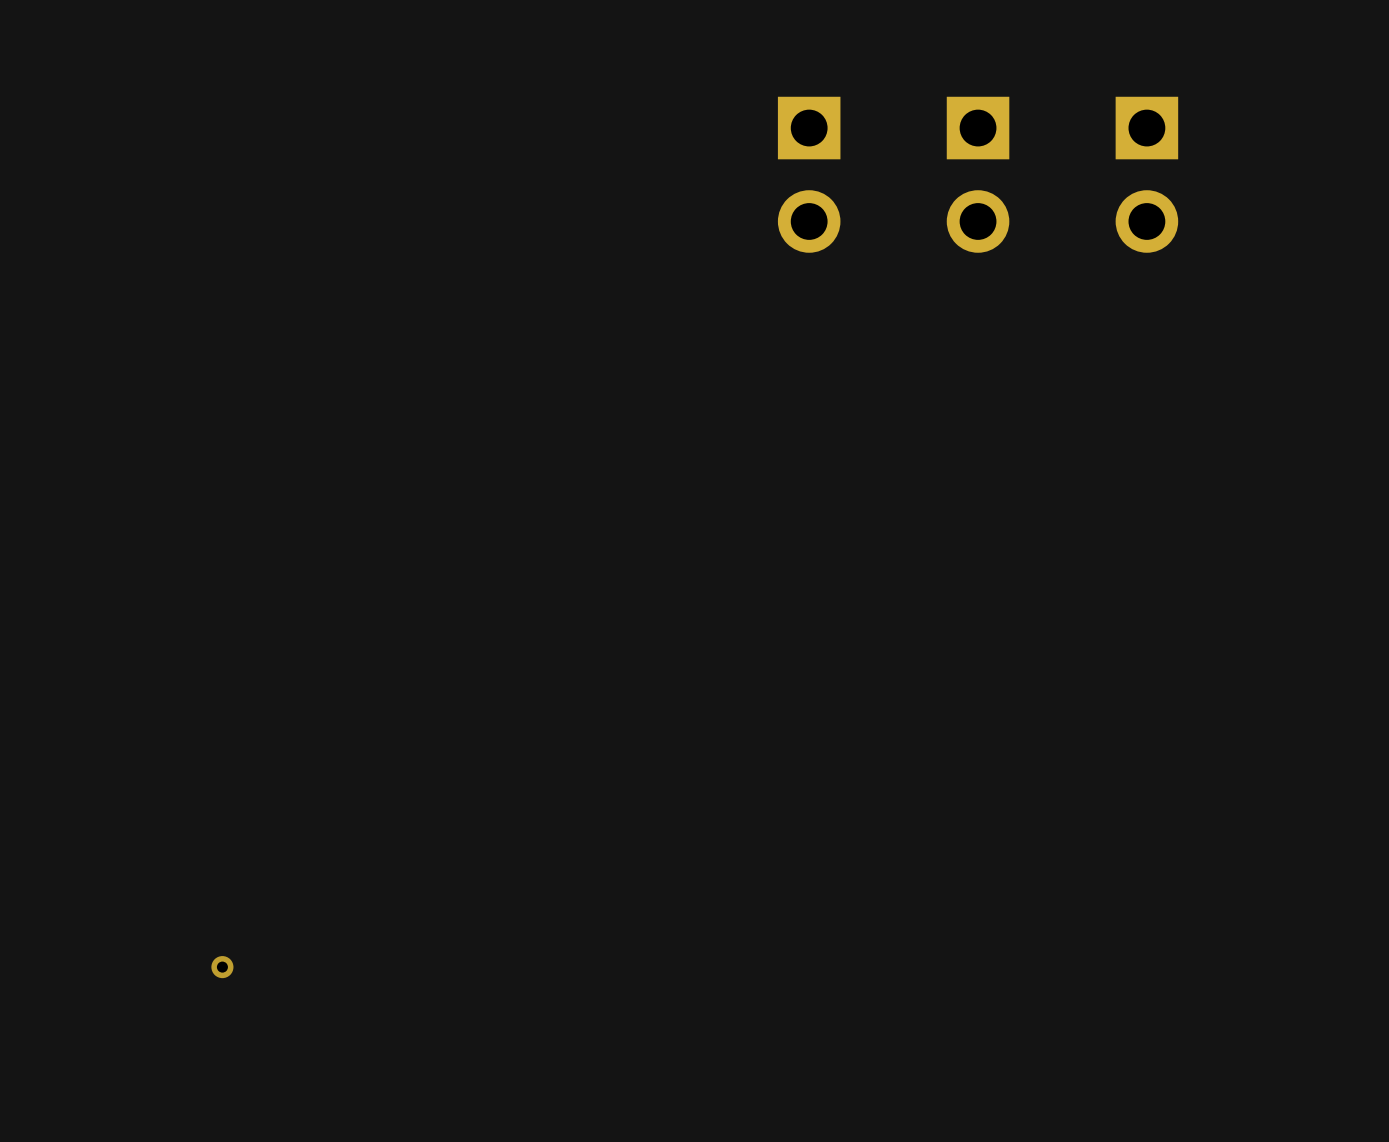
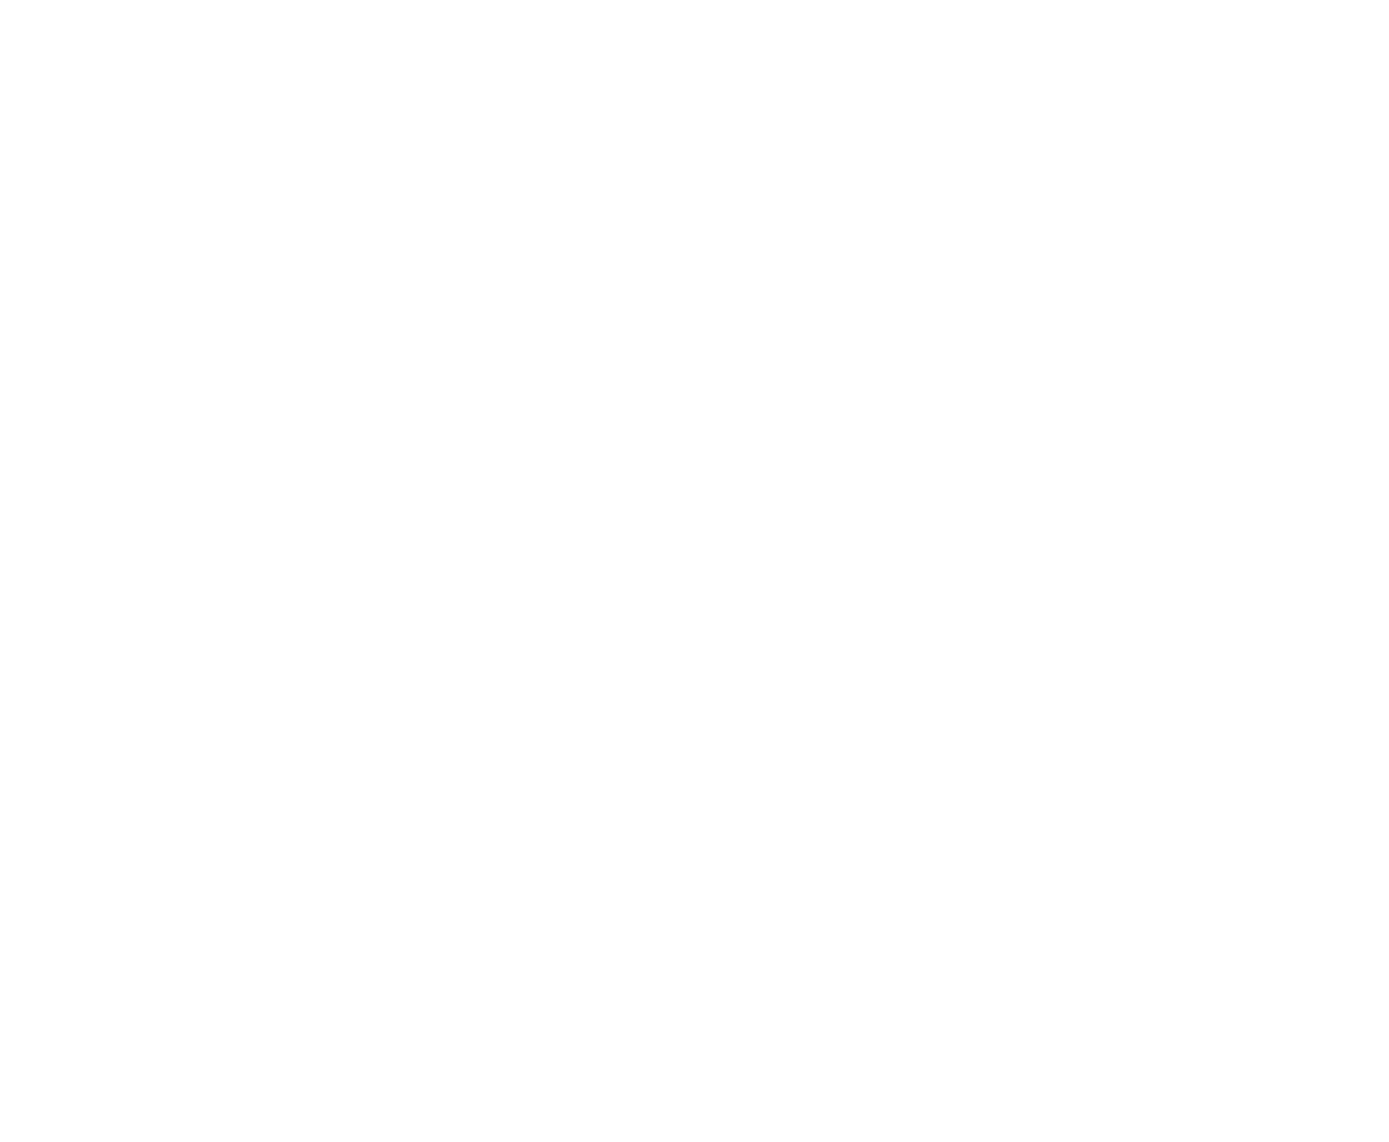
part: (809, 174) -> none
part: (978, 174) -> none
part: (1146, 174) -> none
via: (222, 967) -> none

